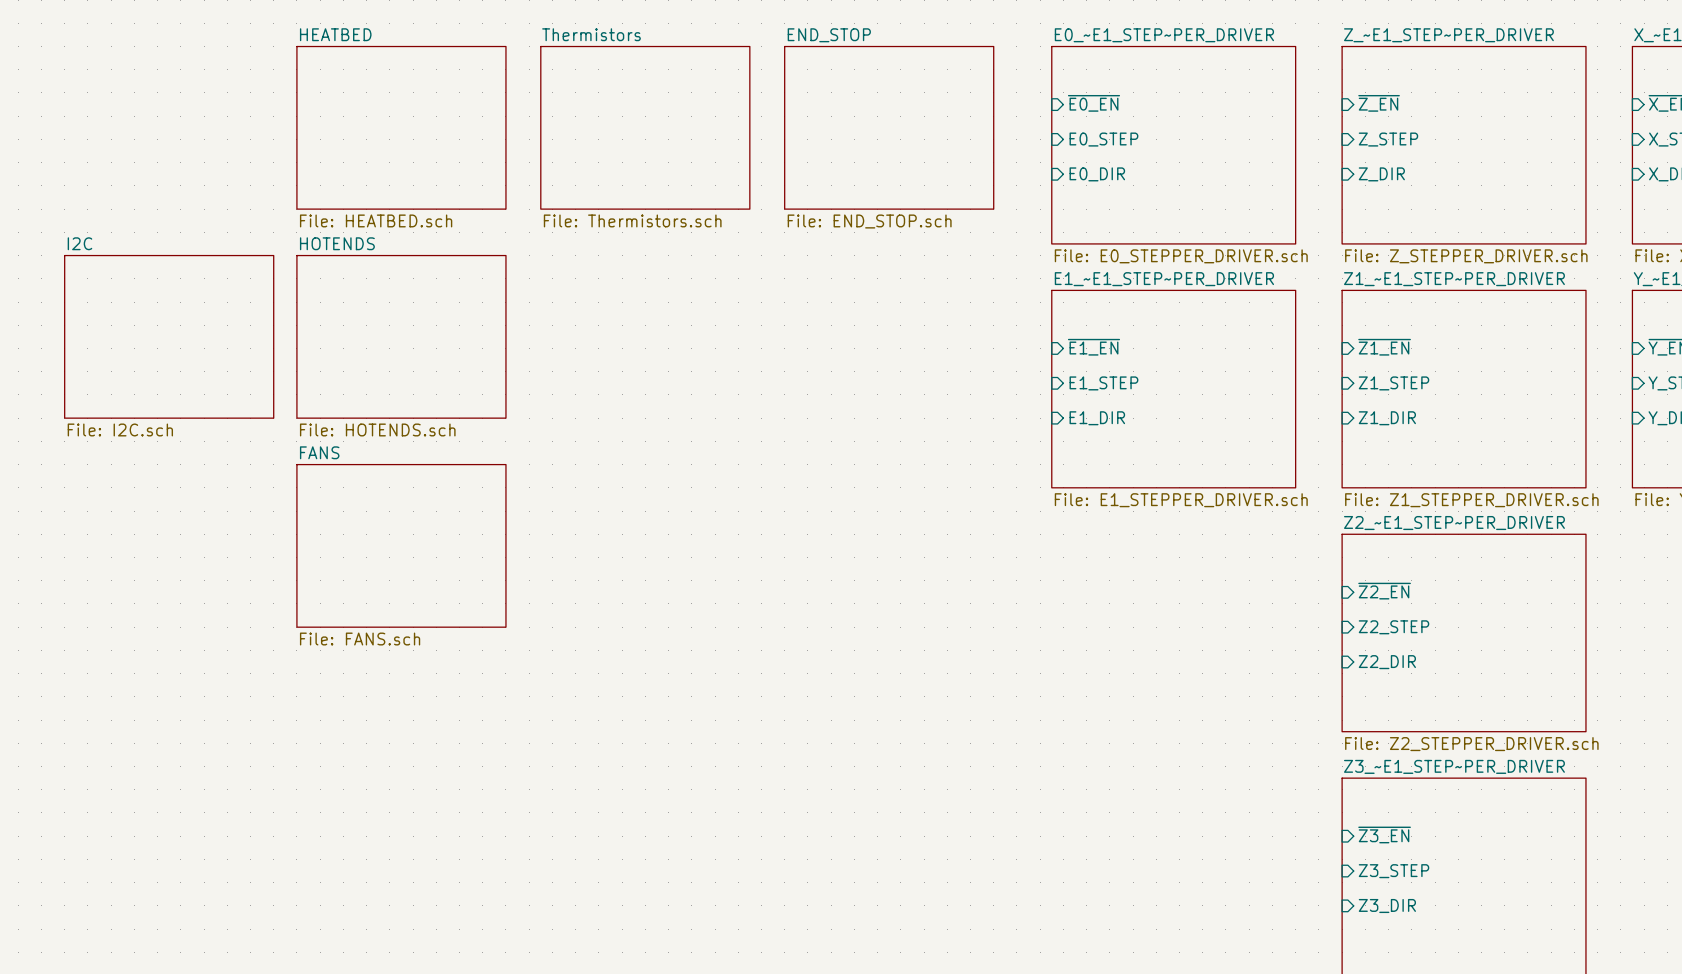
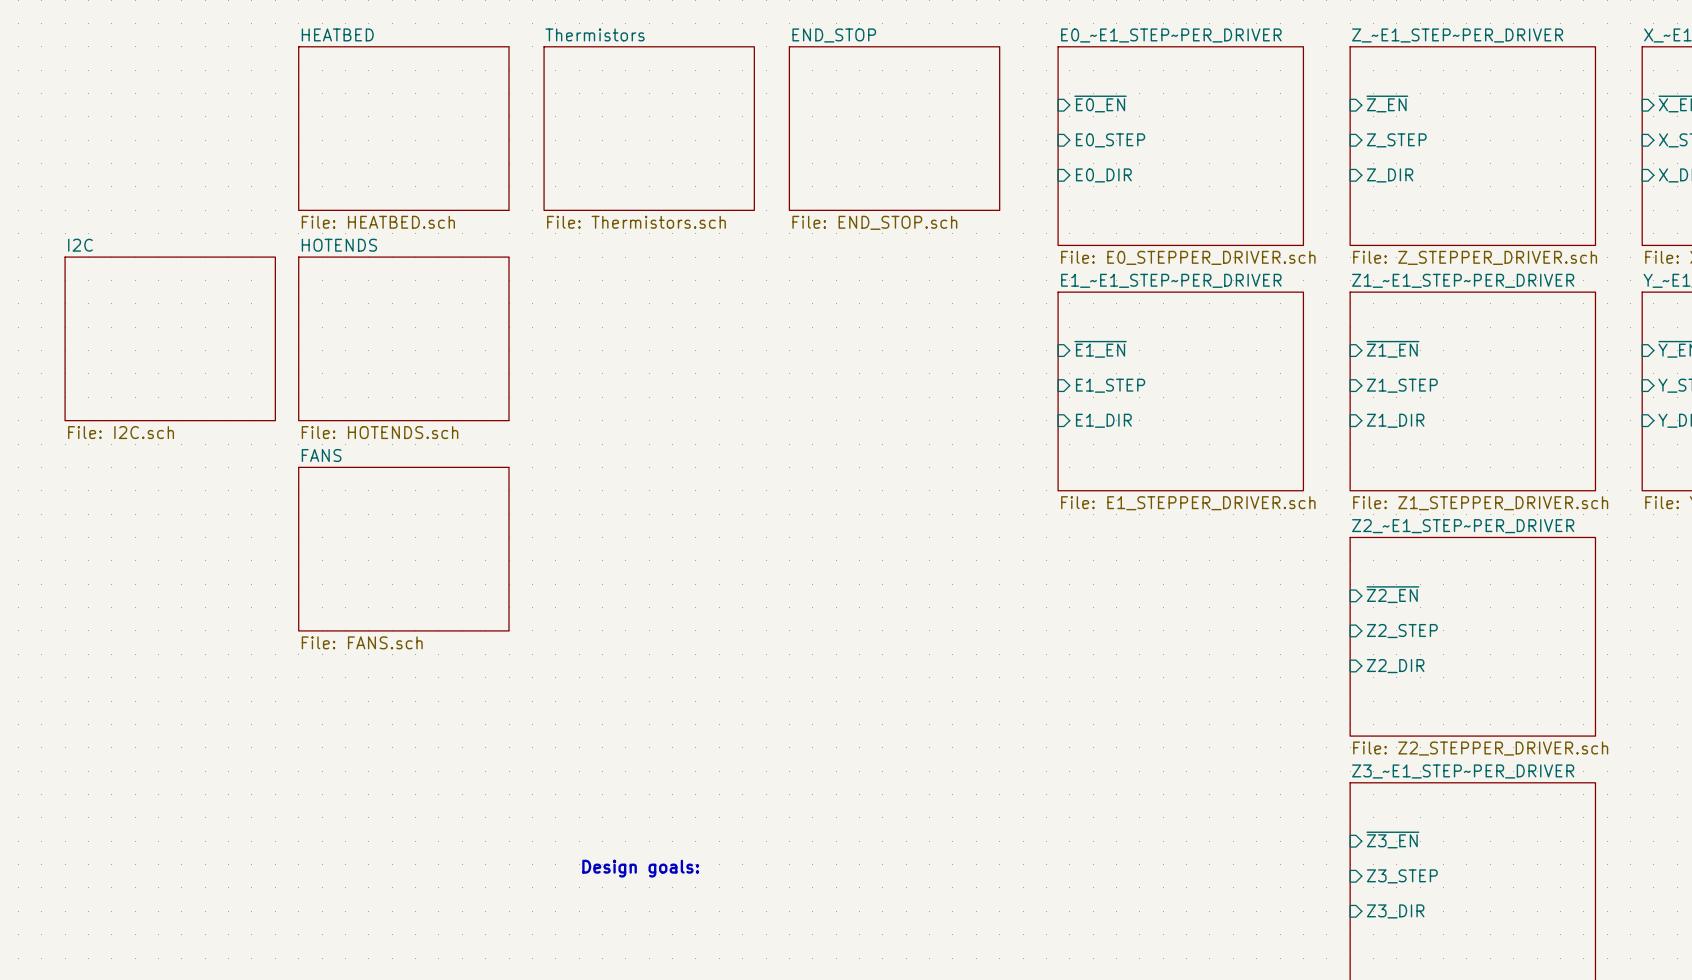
text: none -> Design goals: (640, 868)

